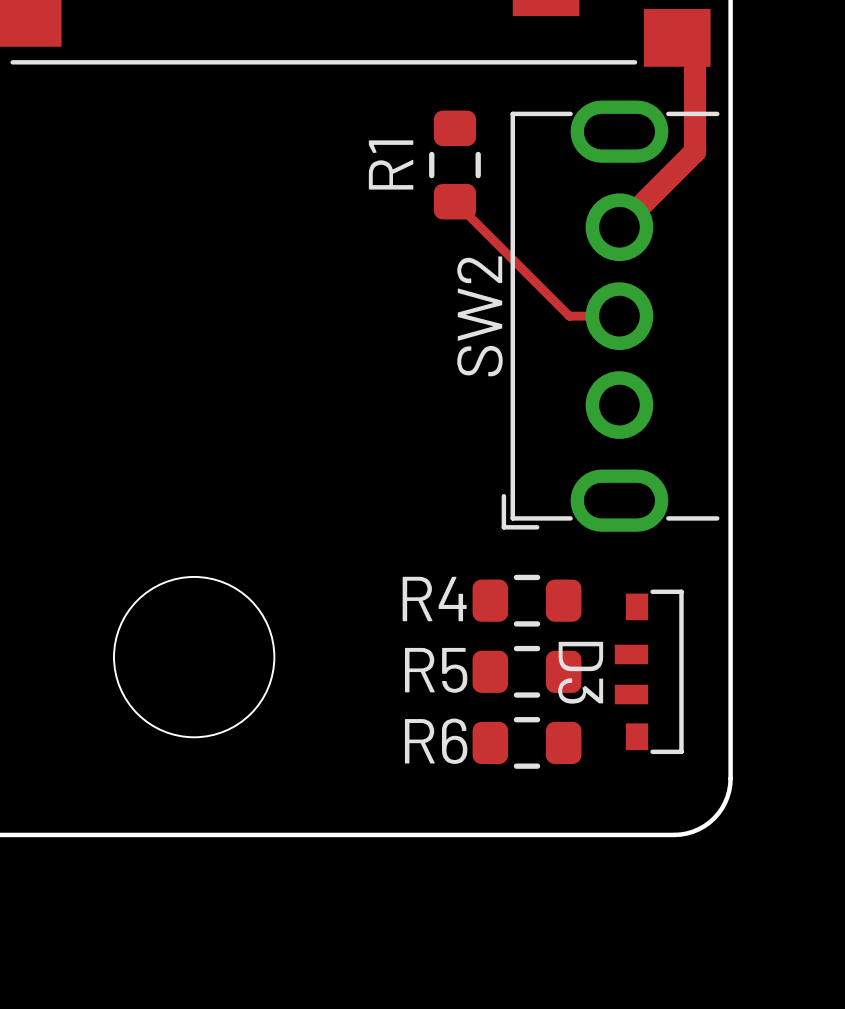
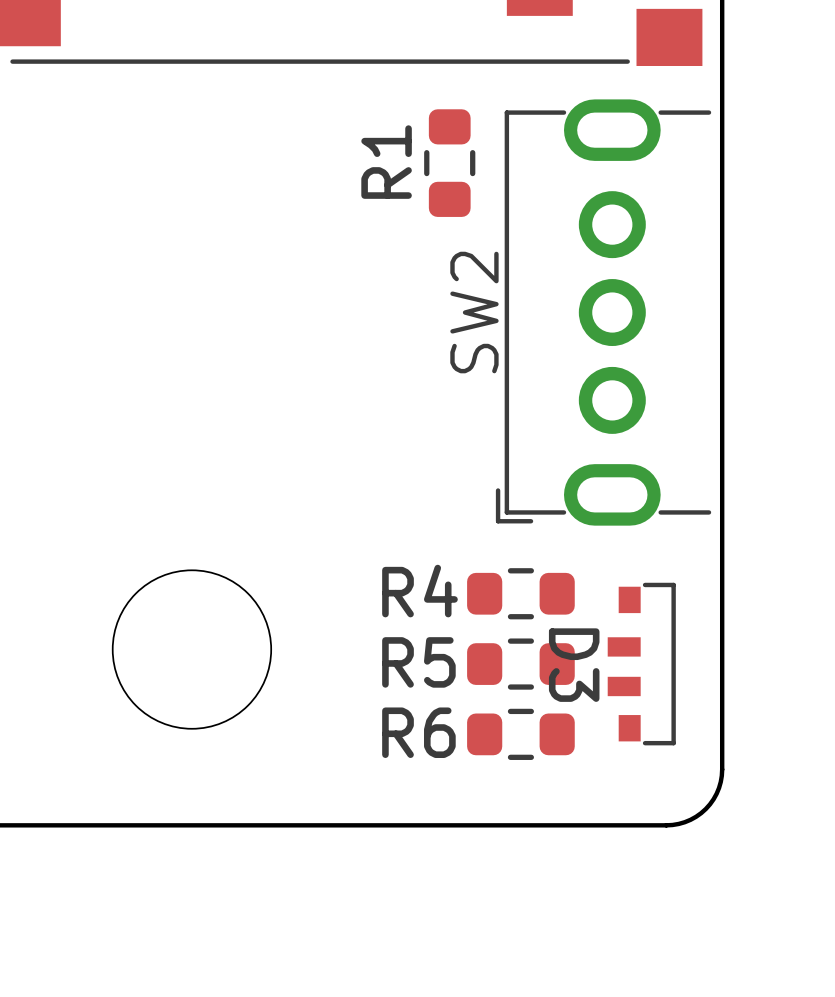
track: (677, 37) (695, 55) (695, 151) (619, 227) -> none
track: (454, 201) (569, 316) (619, 316) -> none

